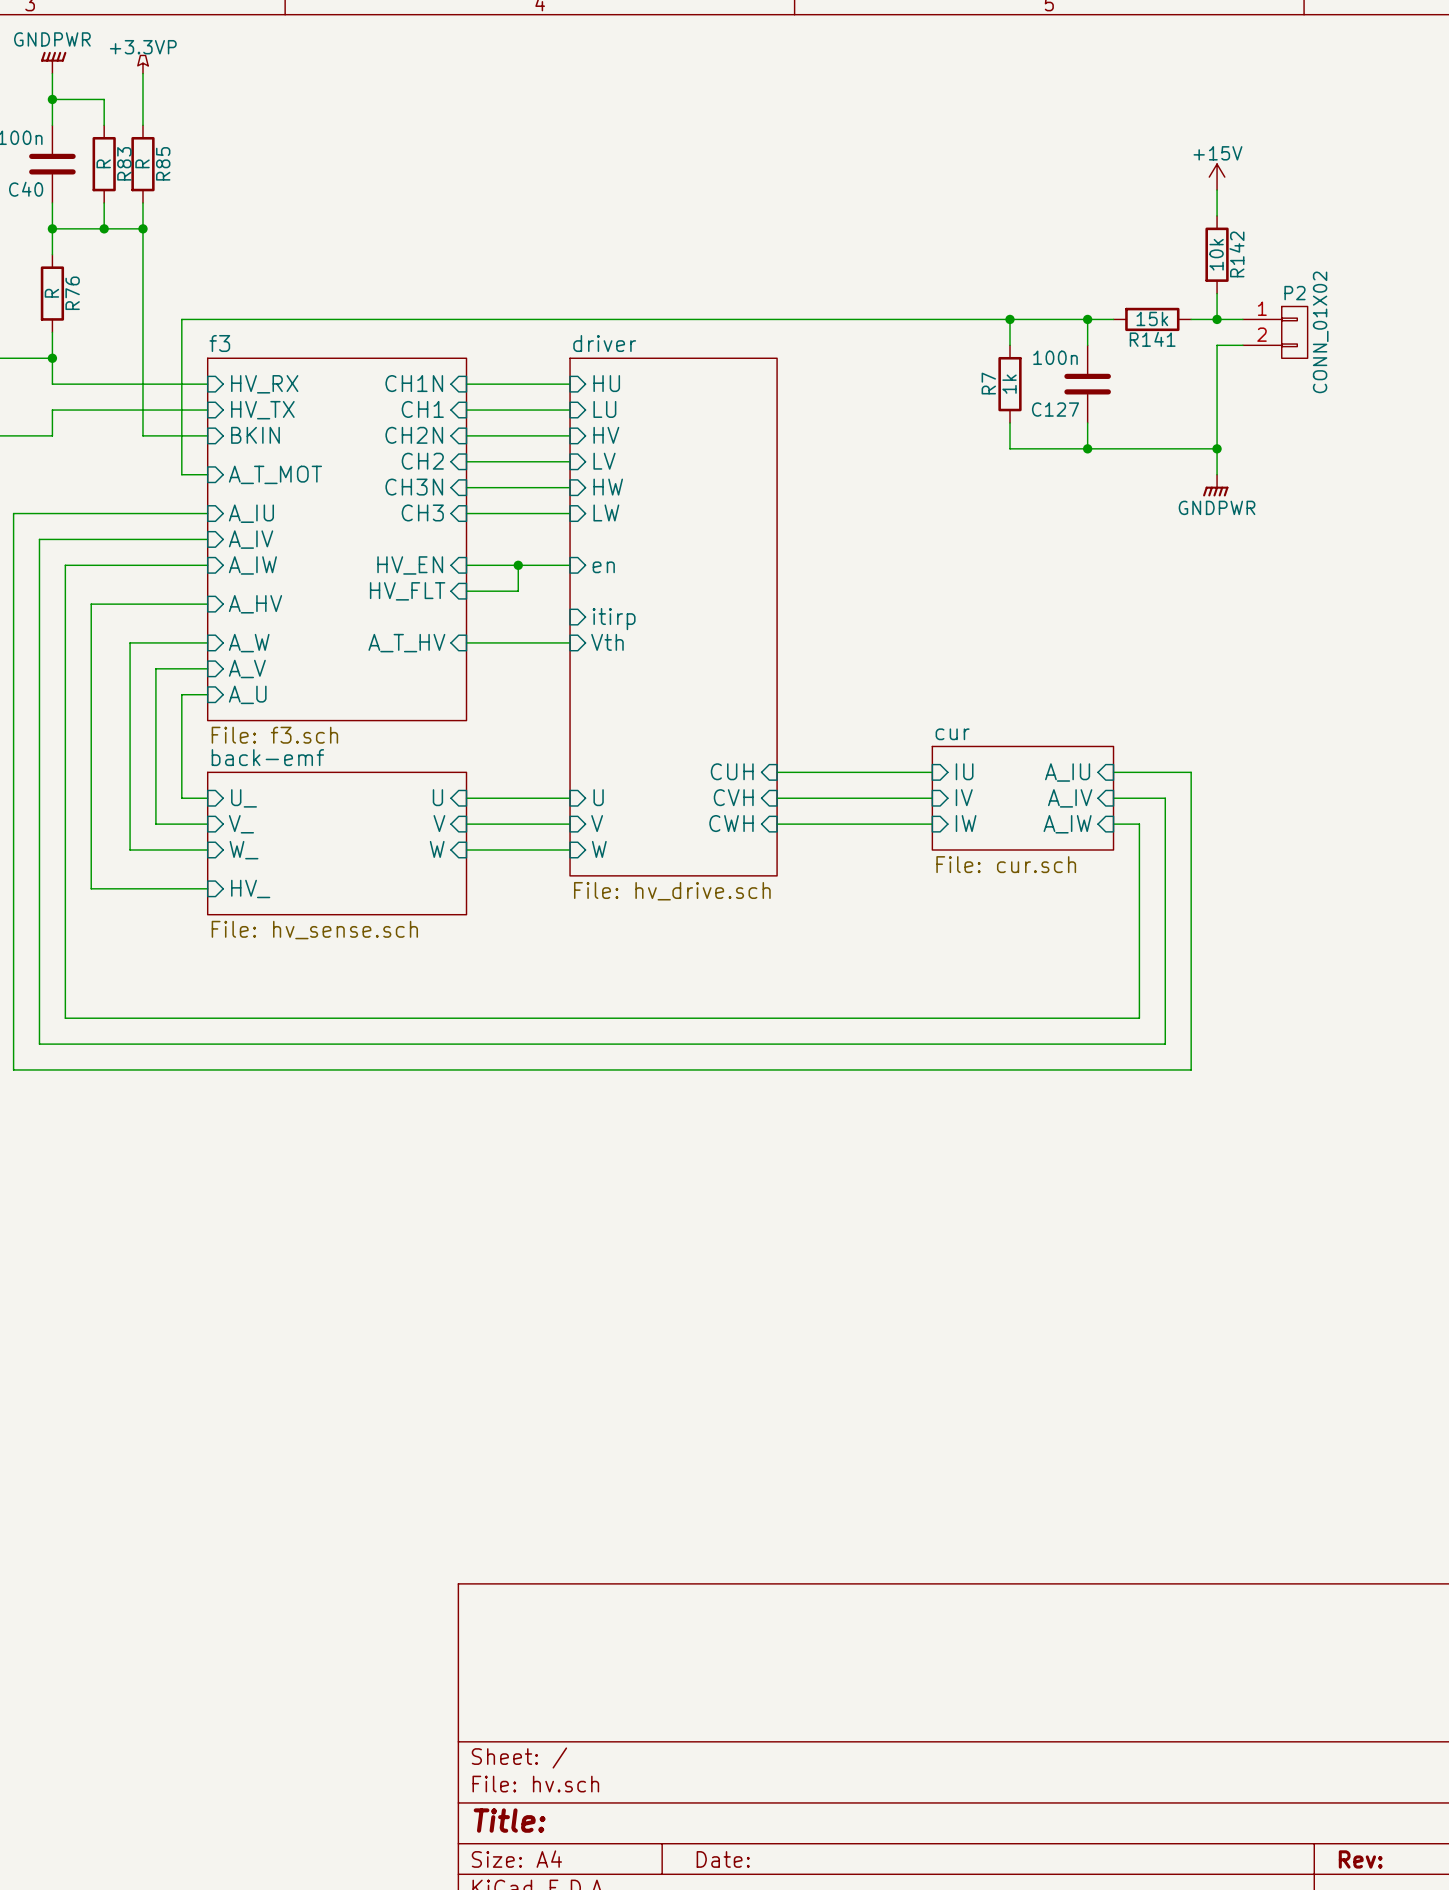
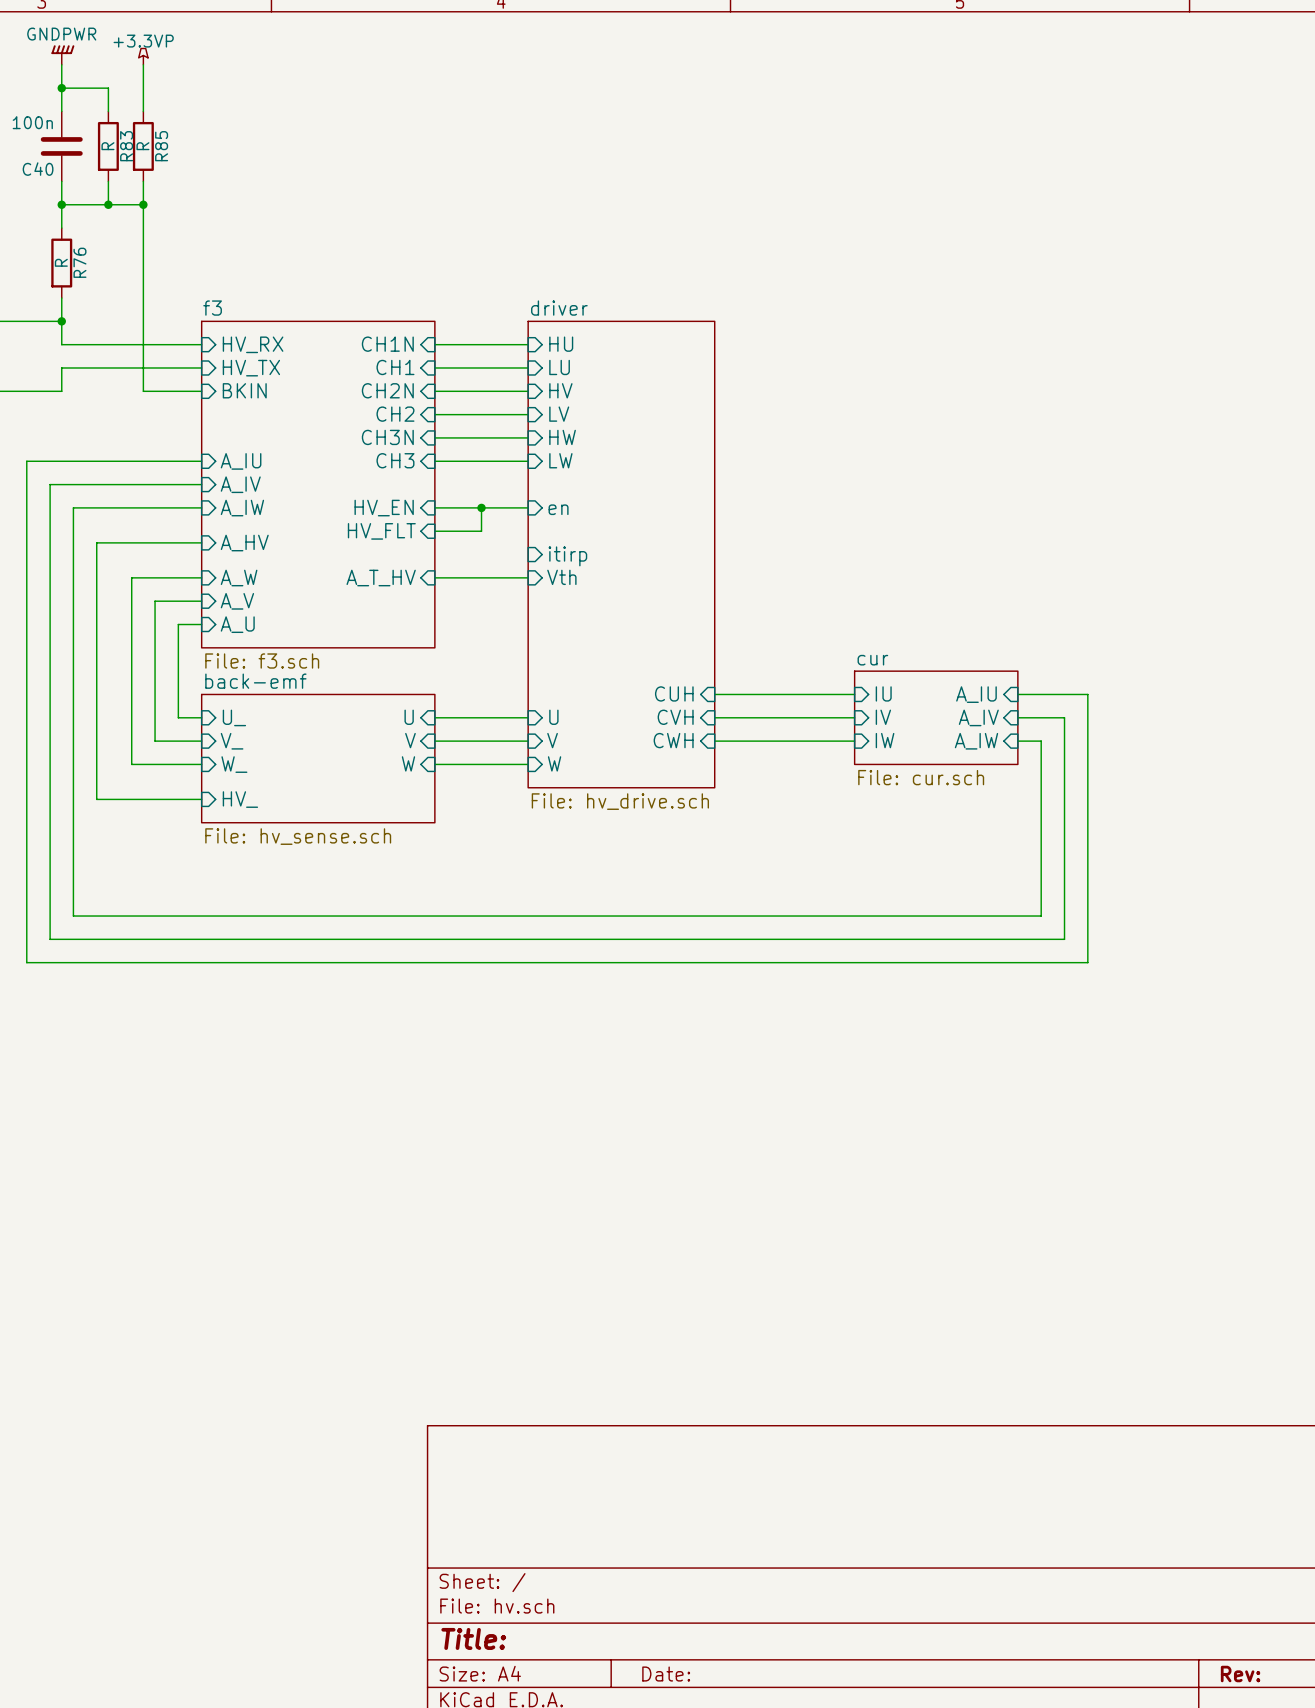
power symbol: +15V (1217, 177) -> none
wire: (1217, 190) (1217, 215) -> none
R142: 10k (1217, 254) -> none
wire: (1217, 293) (1217, 319) -> none
wire: (1010, 319) (1010, 345) -> none
junction: (1010, 319) -> none
wire: (1087, 319) (1087, 345) -> none
junction: (1087, 319) -> none
wire: (1113, 319) (181, 319) (181, 474) (207, 474) -> none
R141: 15k (1152, 319) -> none
wire: (1191, 319) (1242, 319) -> none
junction: (1217, 319) -> none
P2: CONN_01X02 (1275, 332) -> none
wire: (1242, 345) (1217, 345) (1217, 474) -> none
R7: 1k (1010, 384) -> none
C127: 100n (1087, 384) -> none
wire: (1010, 422) (1010, 448) (1217, 448) -> none
wire: (1087, 422) (1087, 448) -> none
junction: (1087, 448) -> none
junction: (1217, 448) -> none
sheet pin: A_T_MOT (275, 474) -> none
power symbol: GNDPWR (1215, 485) -> none

